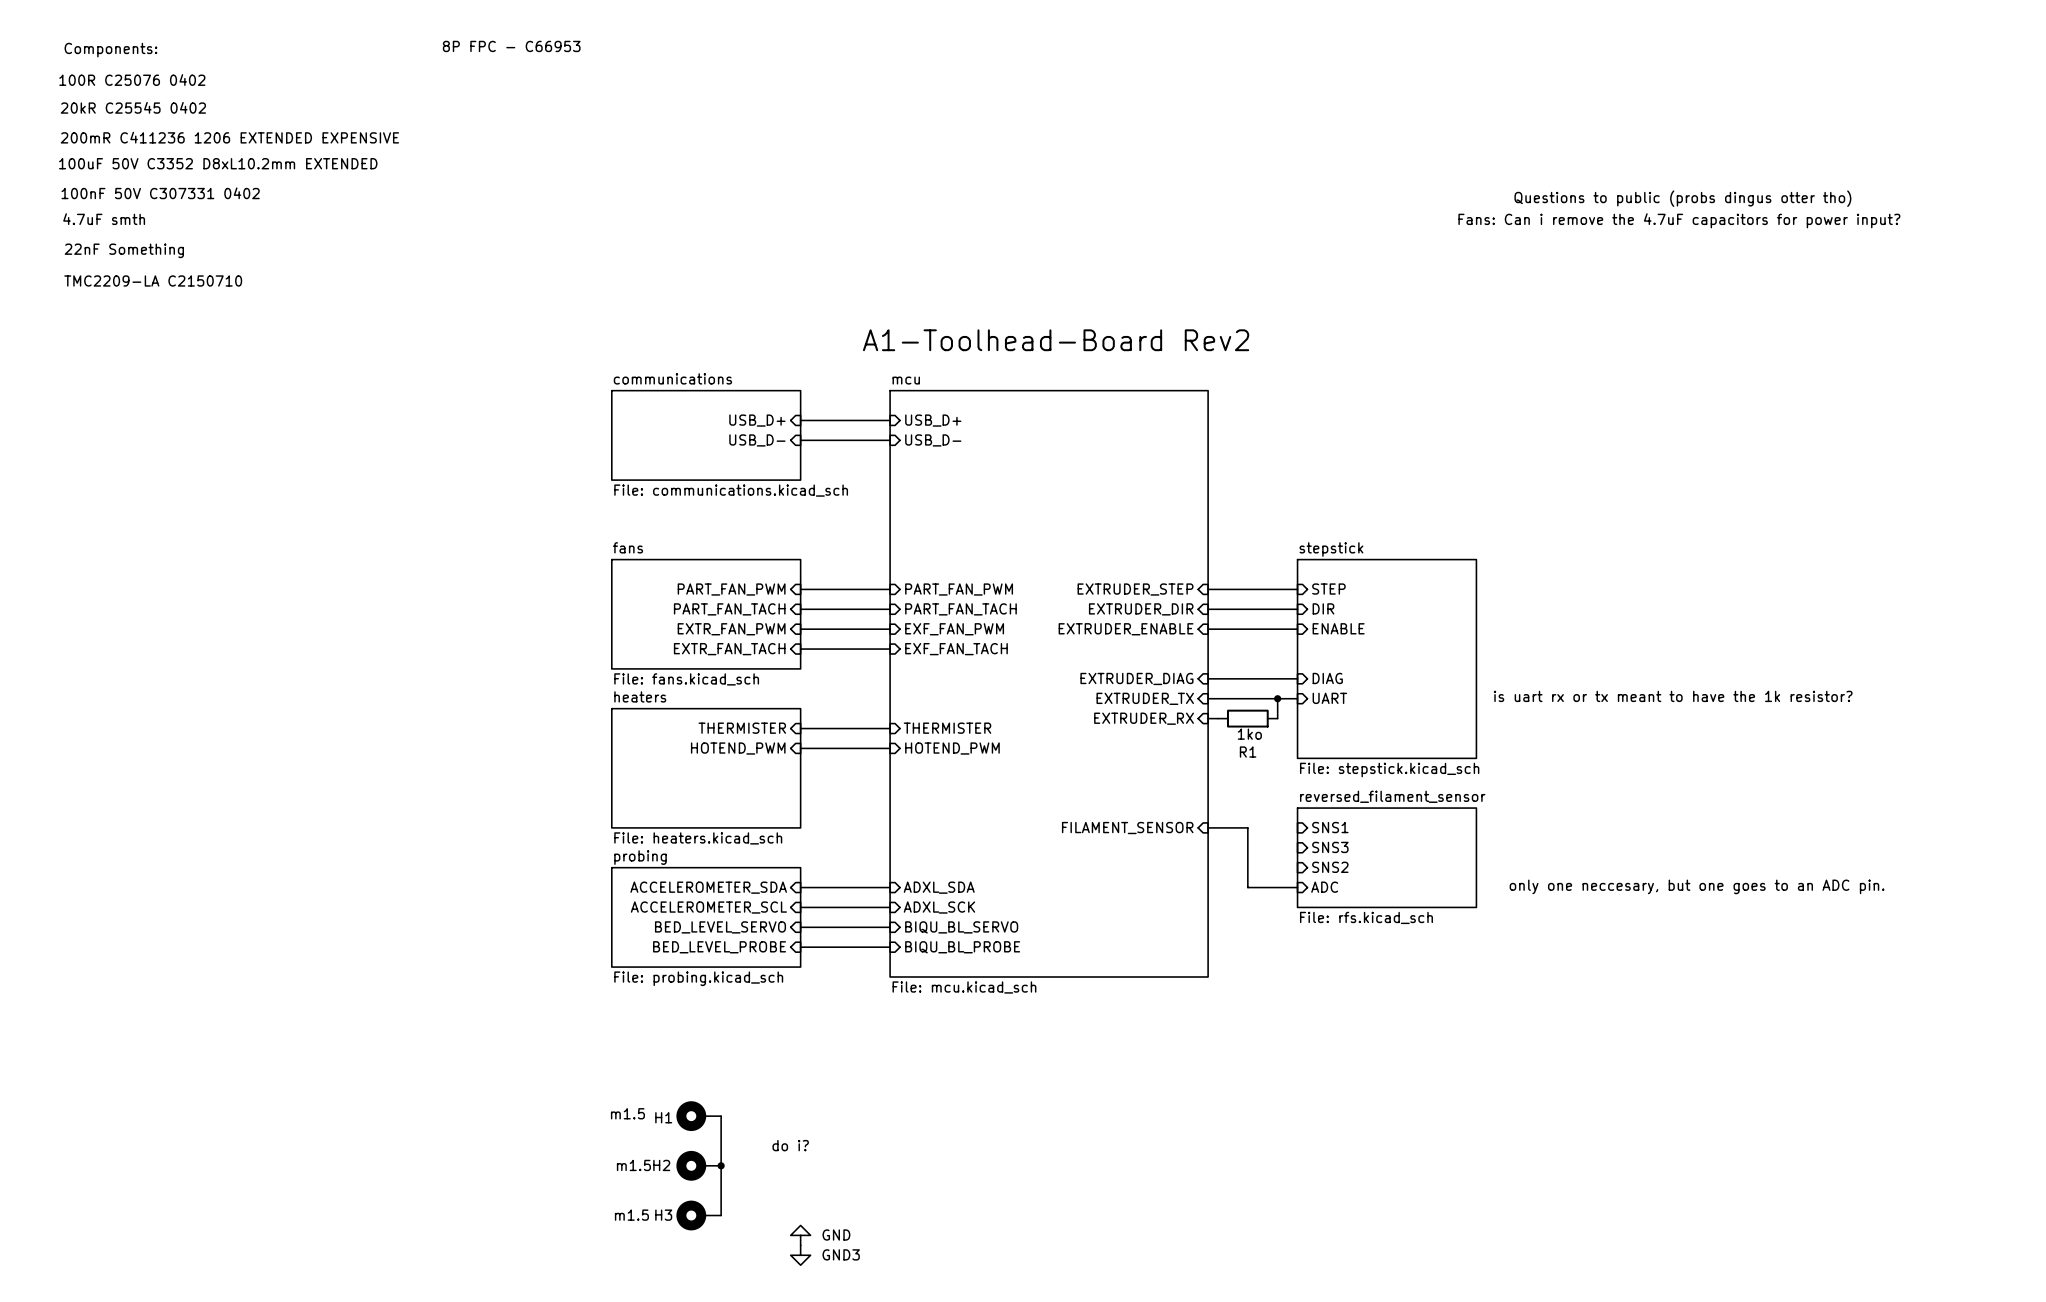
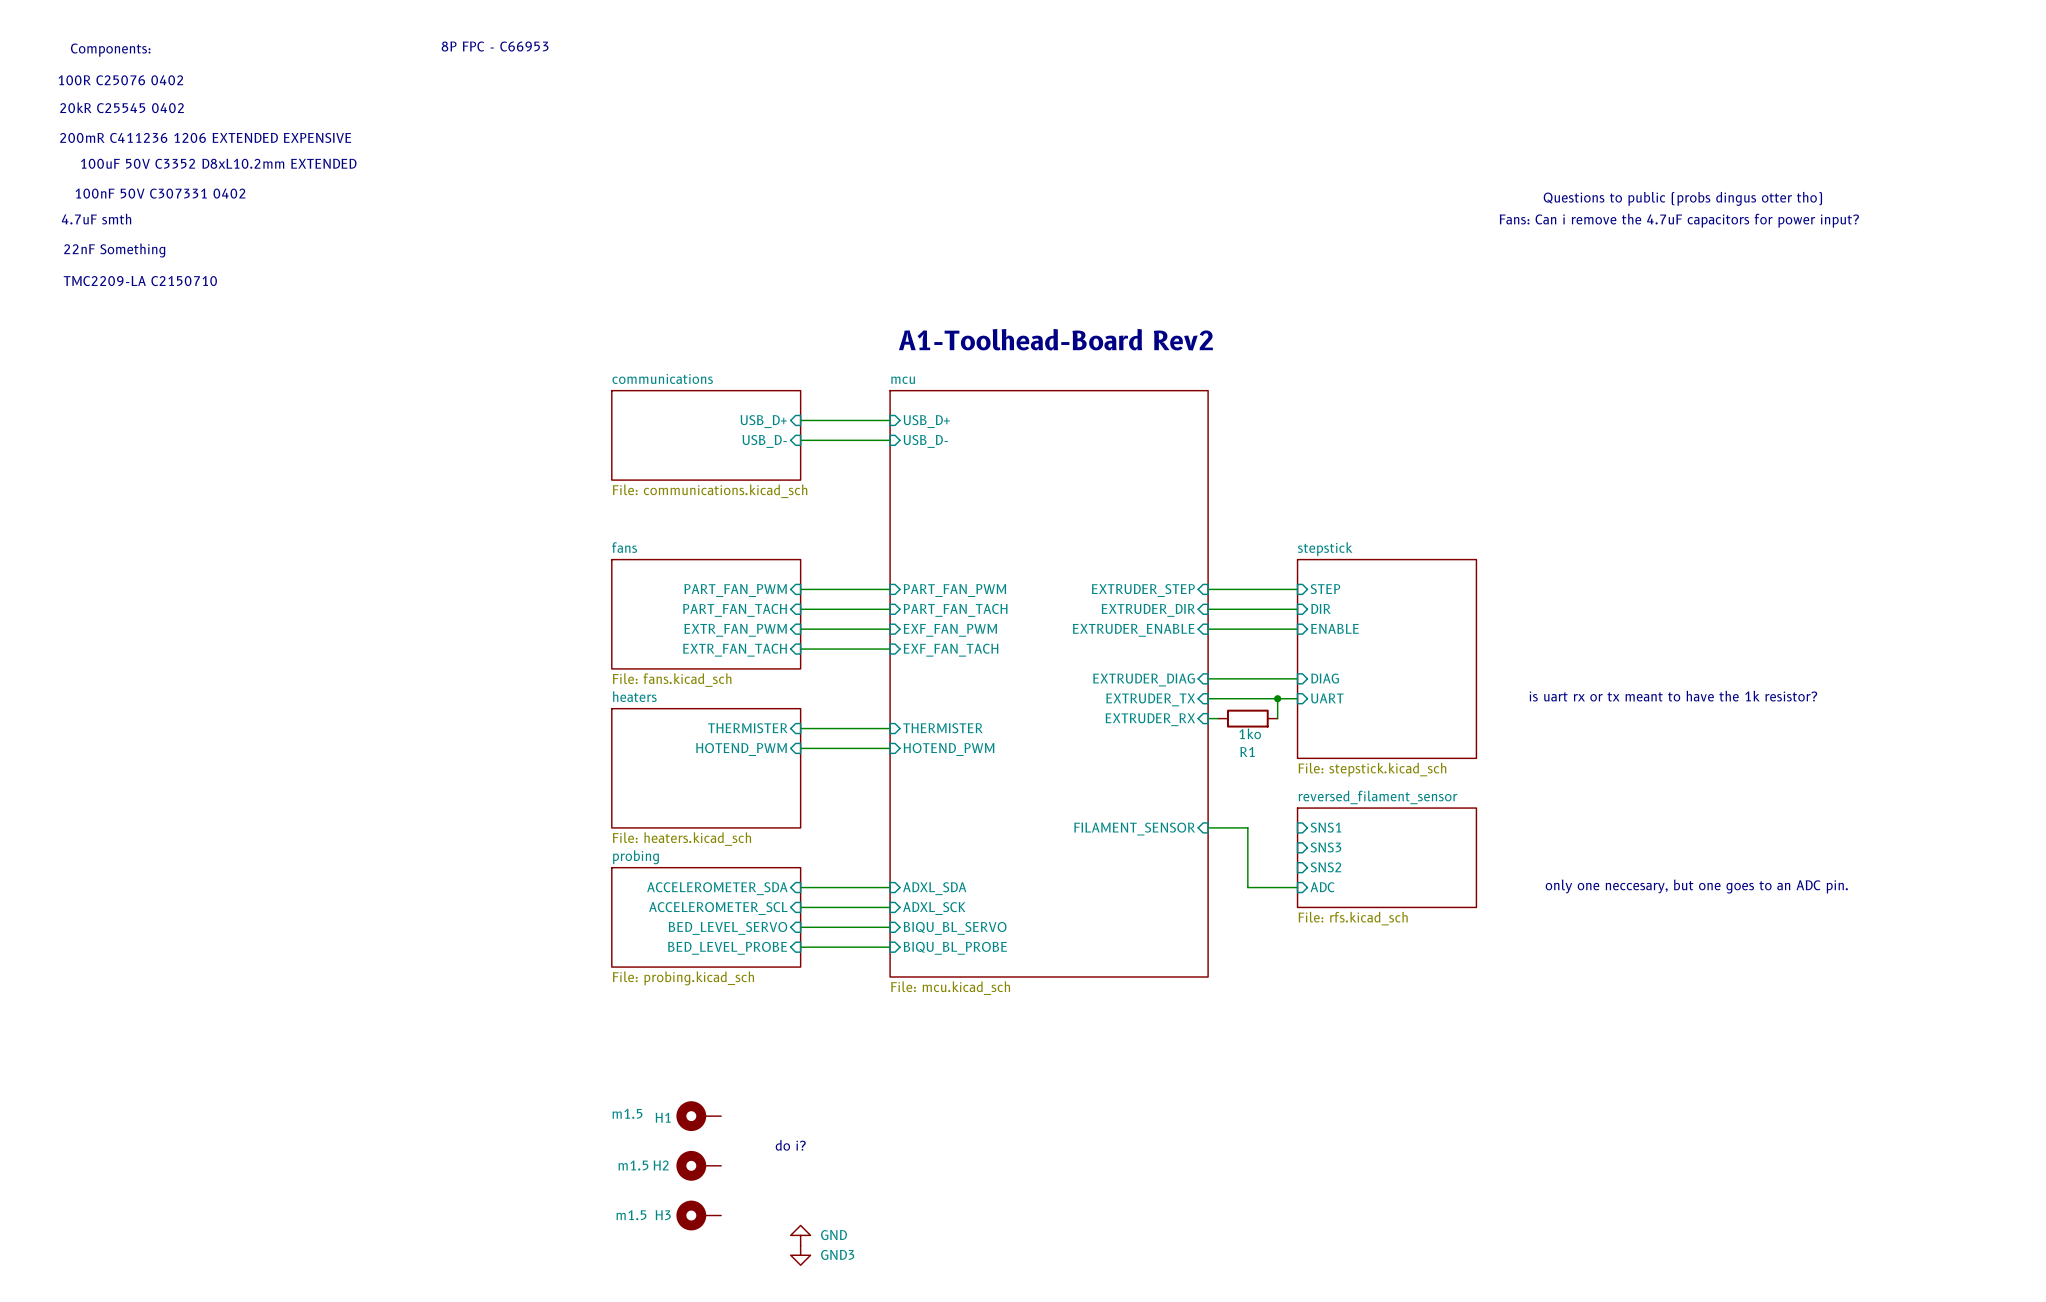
wire: (721, 1116) (721, 1215) -> none
junction: (721, 1165) -> none

